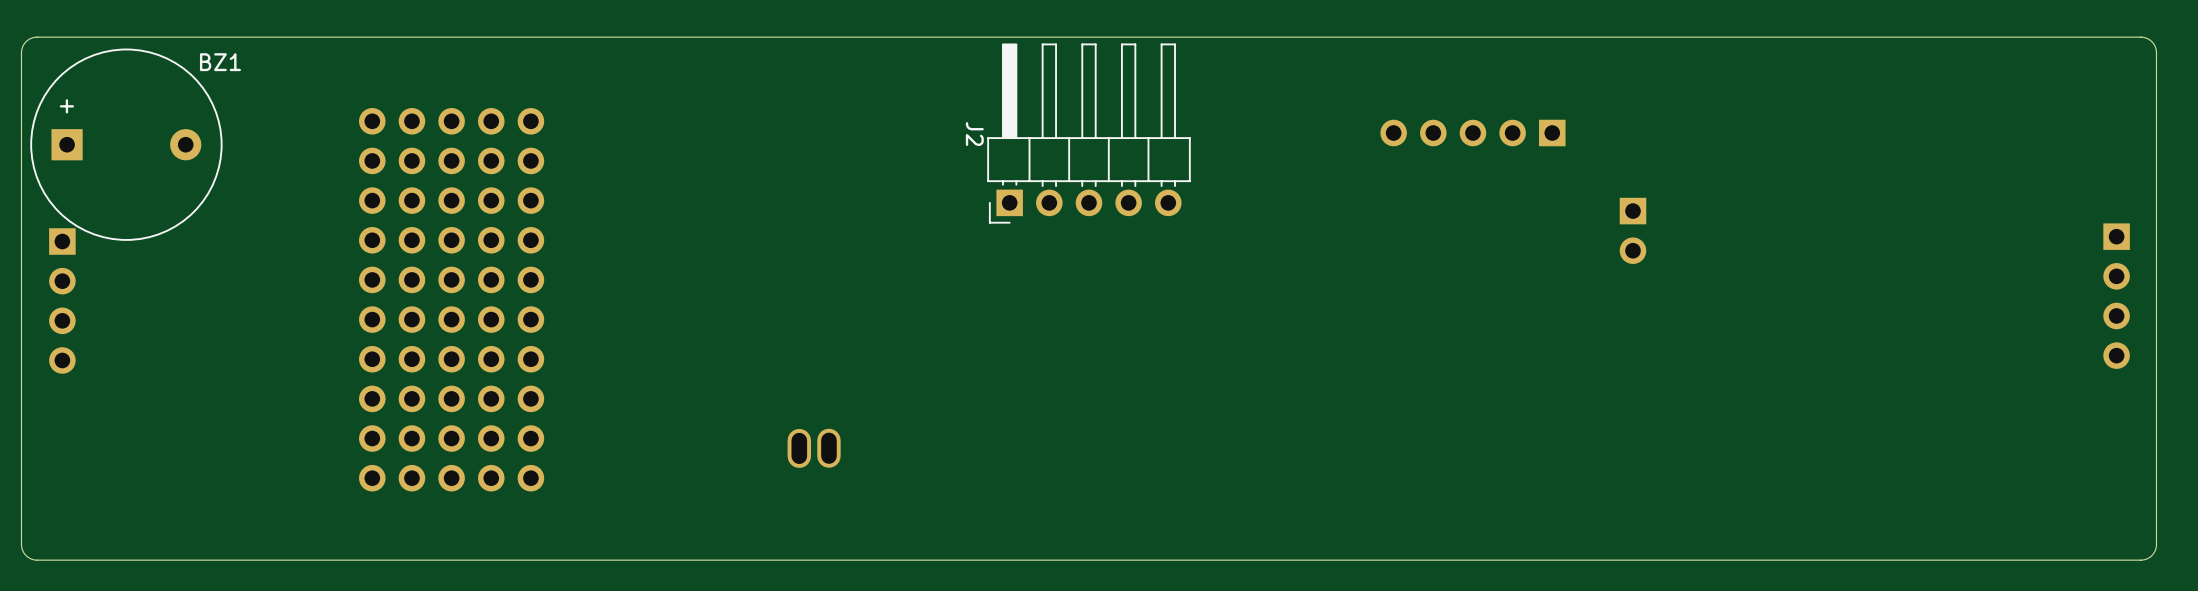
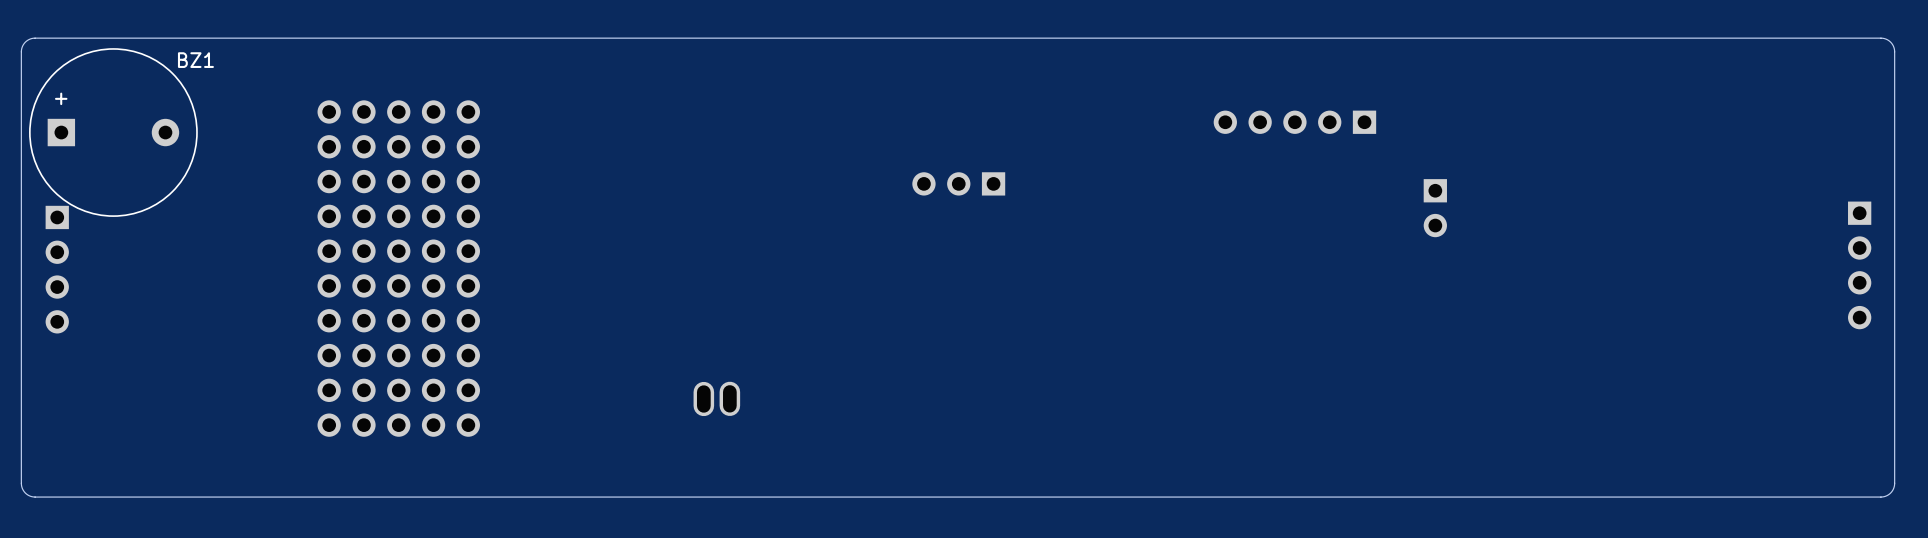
J2: (1088, 133) -> none
part: none -> (958, 183)

